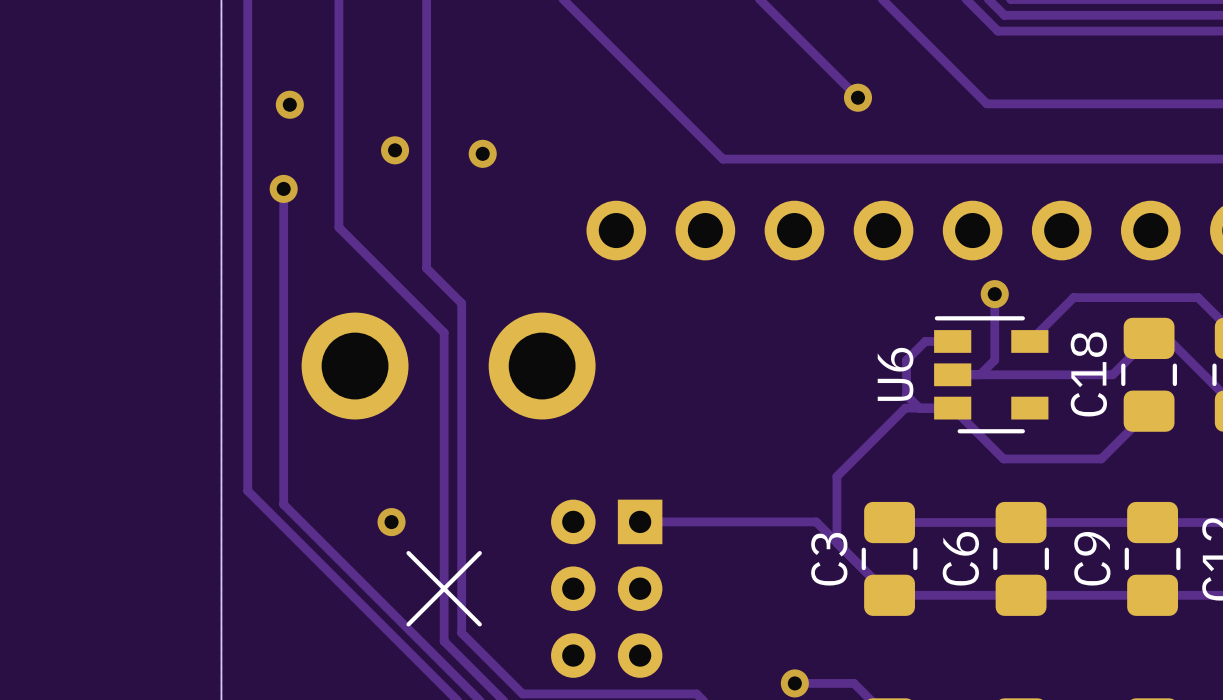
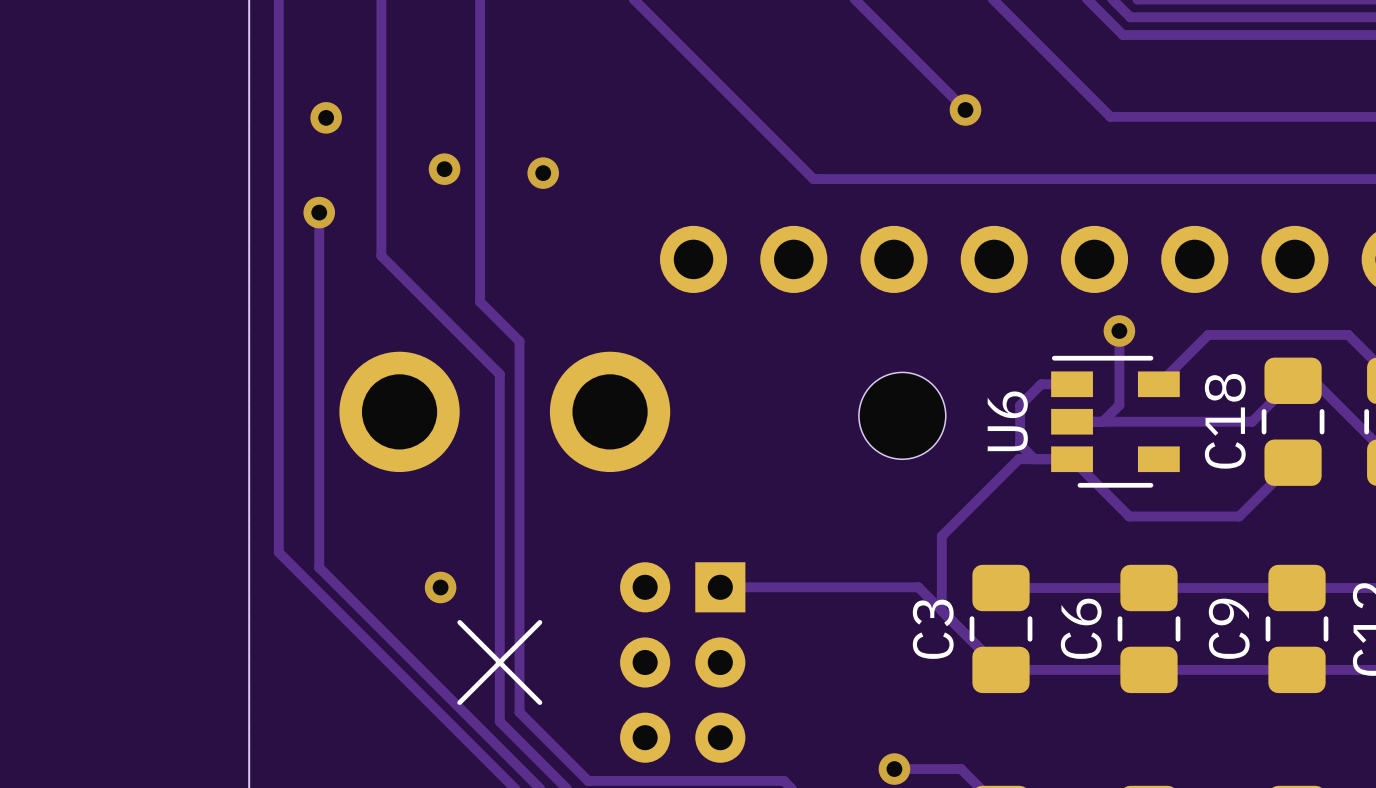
part: none -> (902, 415)

